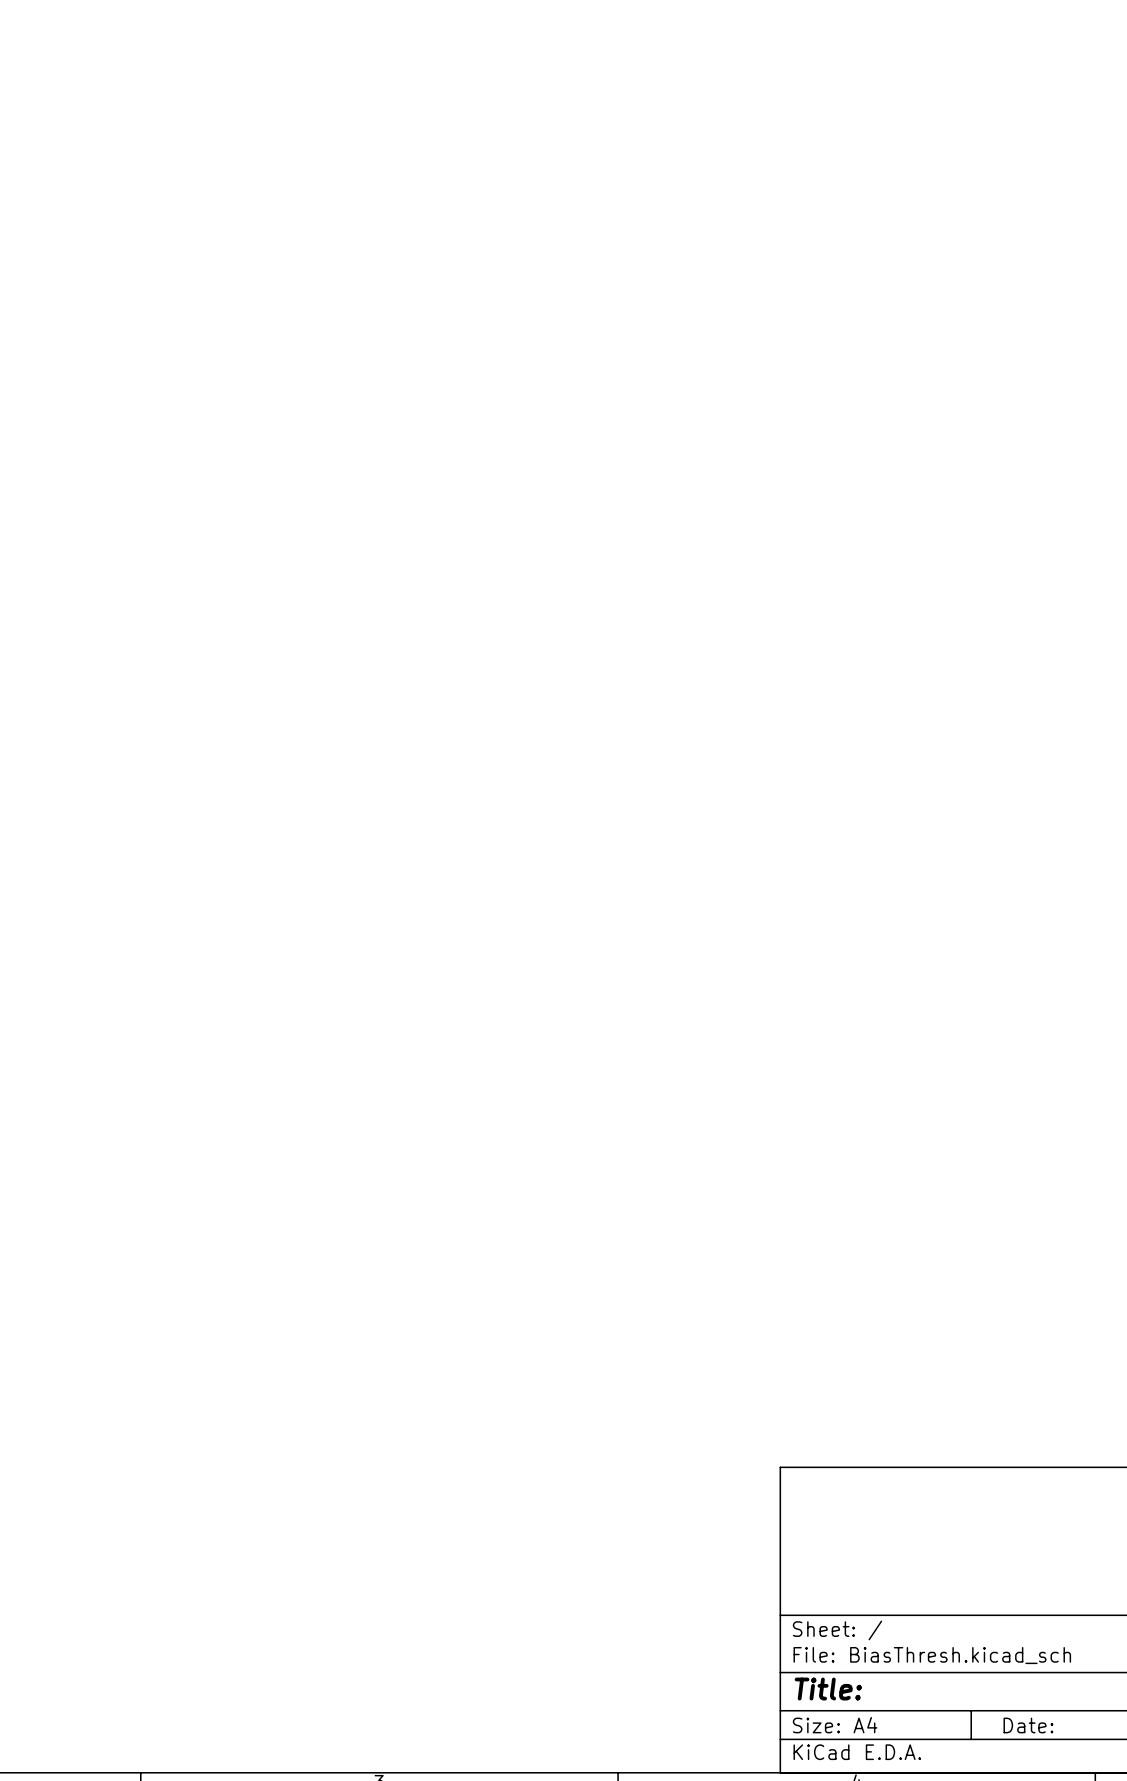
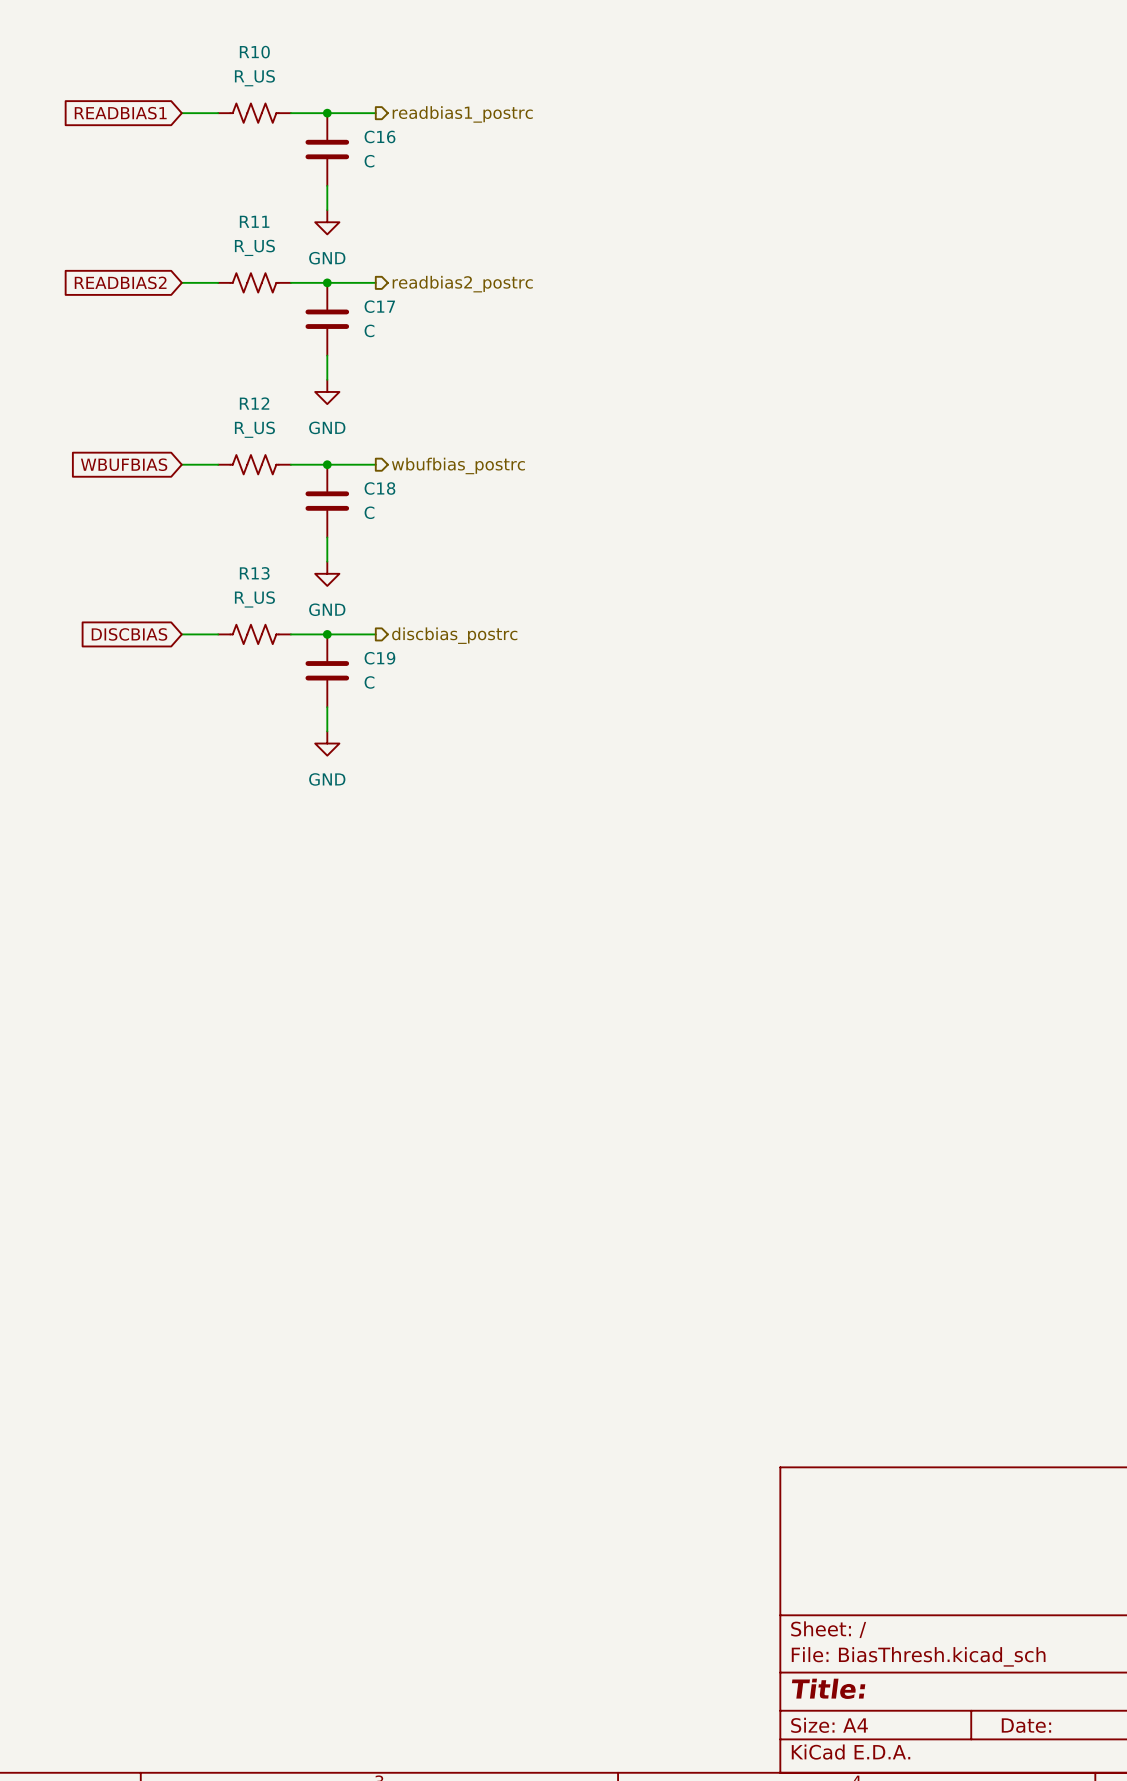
global label: none -> READBIAS1 (120, 113)
wire: none -> (181, 113) (218, 113)
R10: none -> R_US (254, 113)
wire: none -> (290, 113) (375, 113)
junction: none -> (327, 113)
hierarchical label: none -> readbias1_postrc (462, 114)
C16: none -> C (327, 149)
wire: none -> (327, 185) (327, 210)
power symbol: none -> GND (327, 222)
global label: none -> READBIAS2 (120, 282)
wire: none -> (181, 282) (218, 282)
R11: none -> R_US (254, 282)
wire: none -> (290, 282) (375, 282)
junction: none -> (327, 282)
hierarchical label: none -> readbias2_postrc (462, 284)
C17: none -> C (327, 319)
wire: none -> (327, 355) (327, 379)
power symbol: none -> GND (327, 391)
global label: none -> WBUFBIAS (124, 464)
wire: none -> (181, 464) (218, 464)
R12: none -> R_US (254, 464)
wire: none -> (290, 464) (375, 464)
junction: none -> (327, 464)
hierarchical label: none -> wbufbias_postrc (458, 465)
C18: none -> C (327, 501)
wire: none -> (327, 537) (327, 561)
power symbol: none -> GND (327, 573)
global label: none -> DISCBIAS (129, 634)
wire: none -> (181, 634) (218, 634)
R13: none -> R_US (254, 634)
wire: none -> (290, 634) (375, 634)
junction: none -> (327, 634)
hierarchical label: none -> discbias_postrc (454, 635)
C19: none -> C (327, 670)
wire: none -> (327, 707) (327, 731)
power symbol: none -> GND (327, 743)

